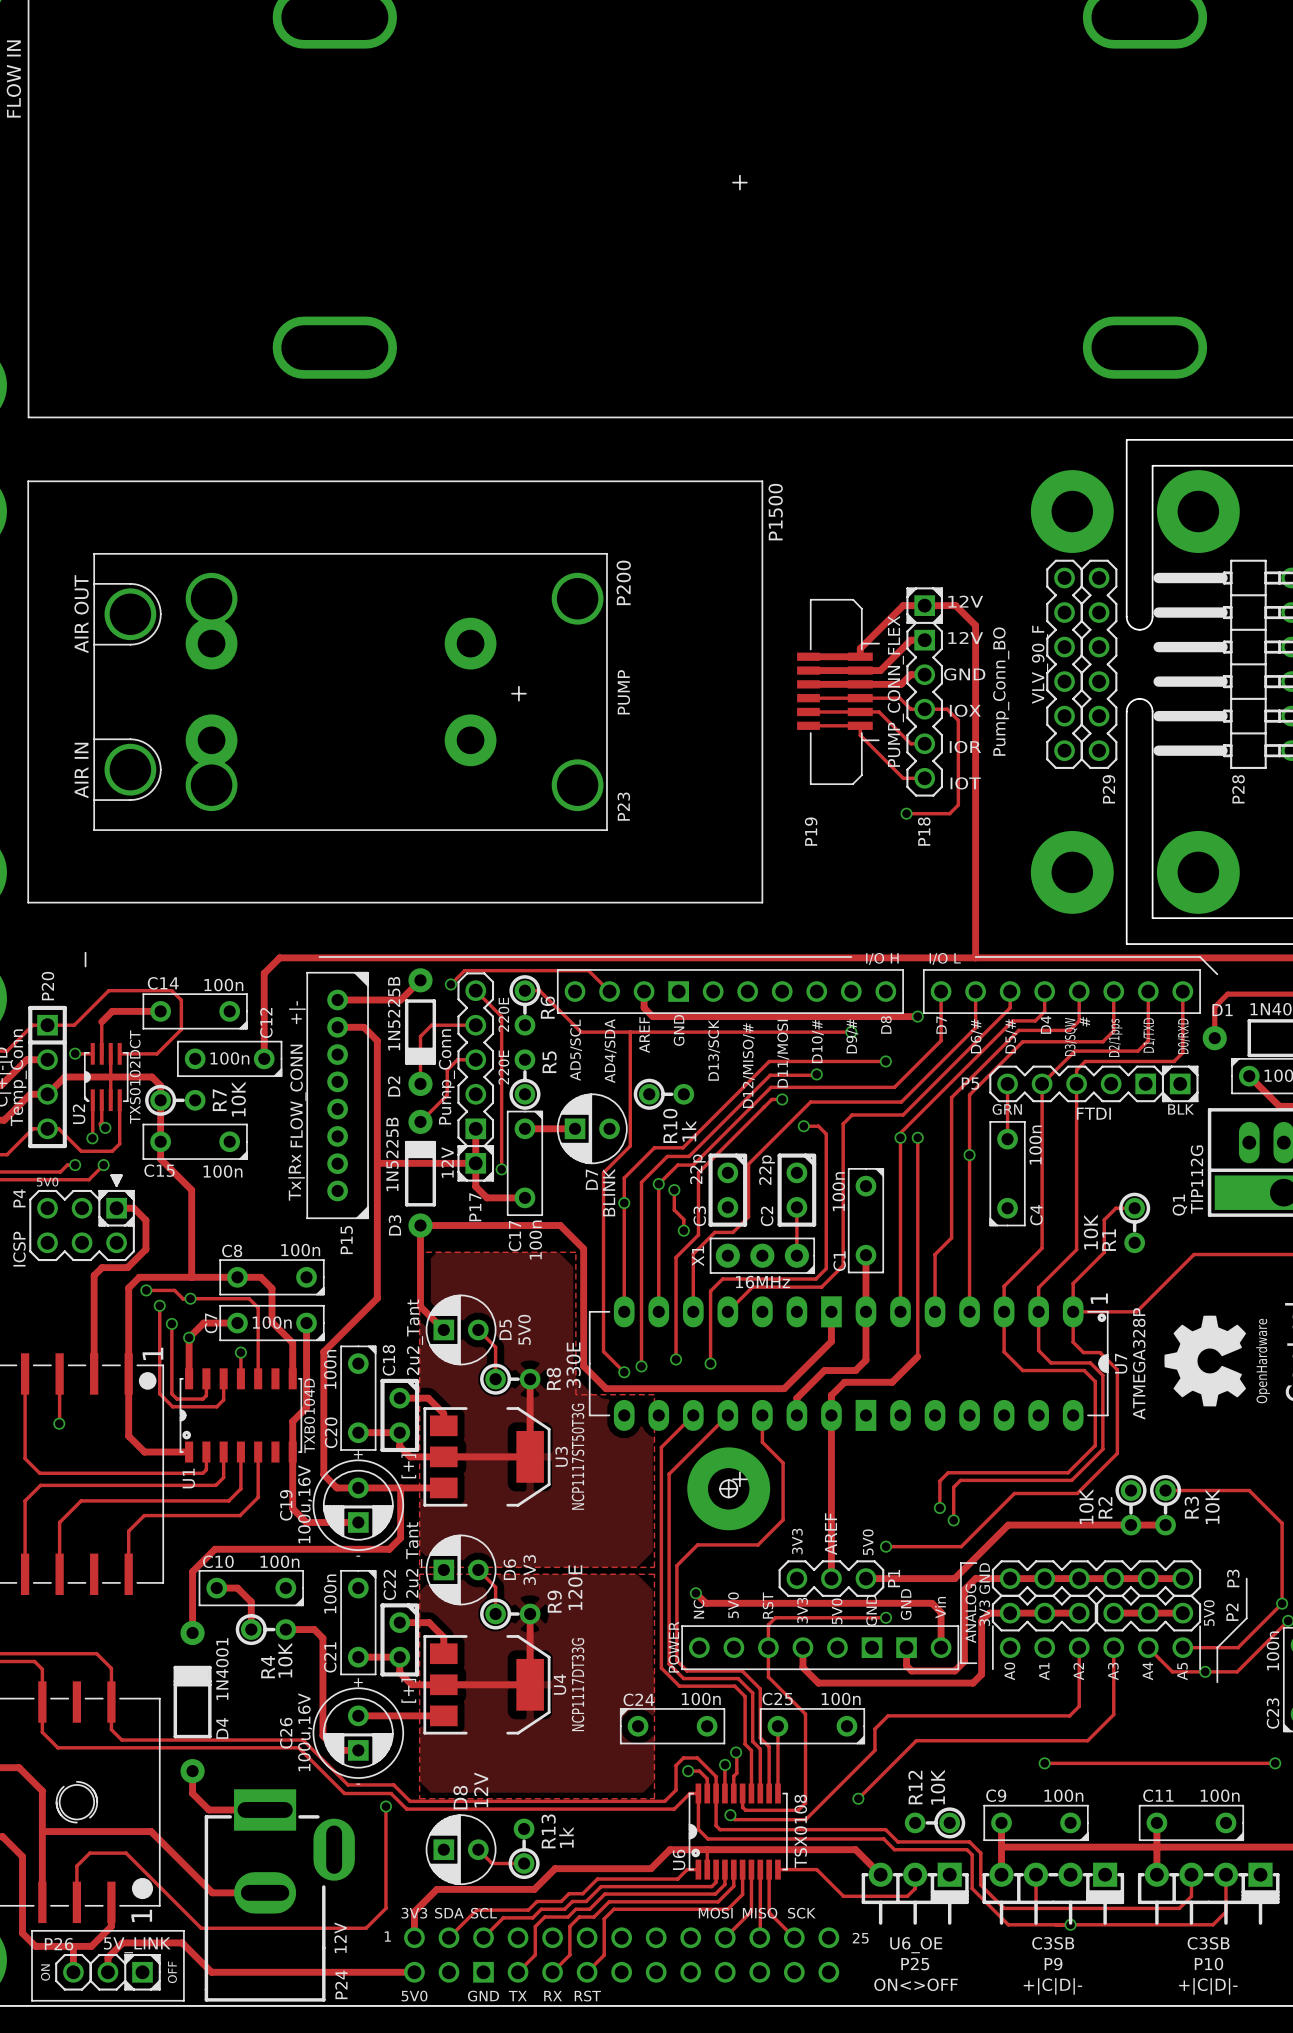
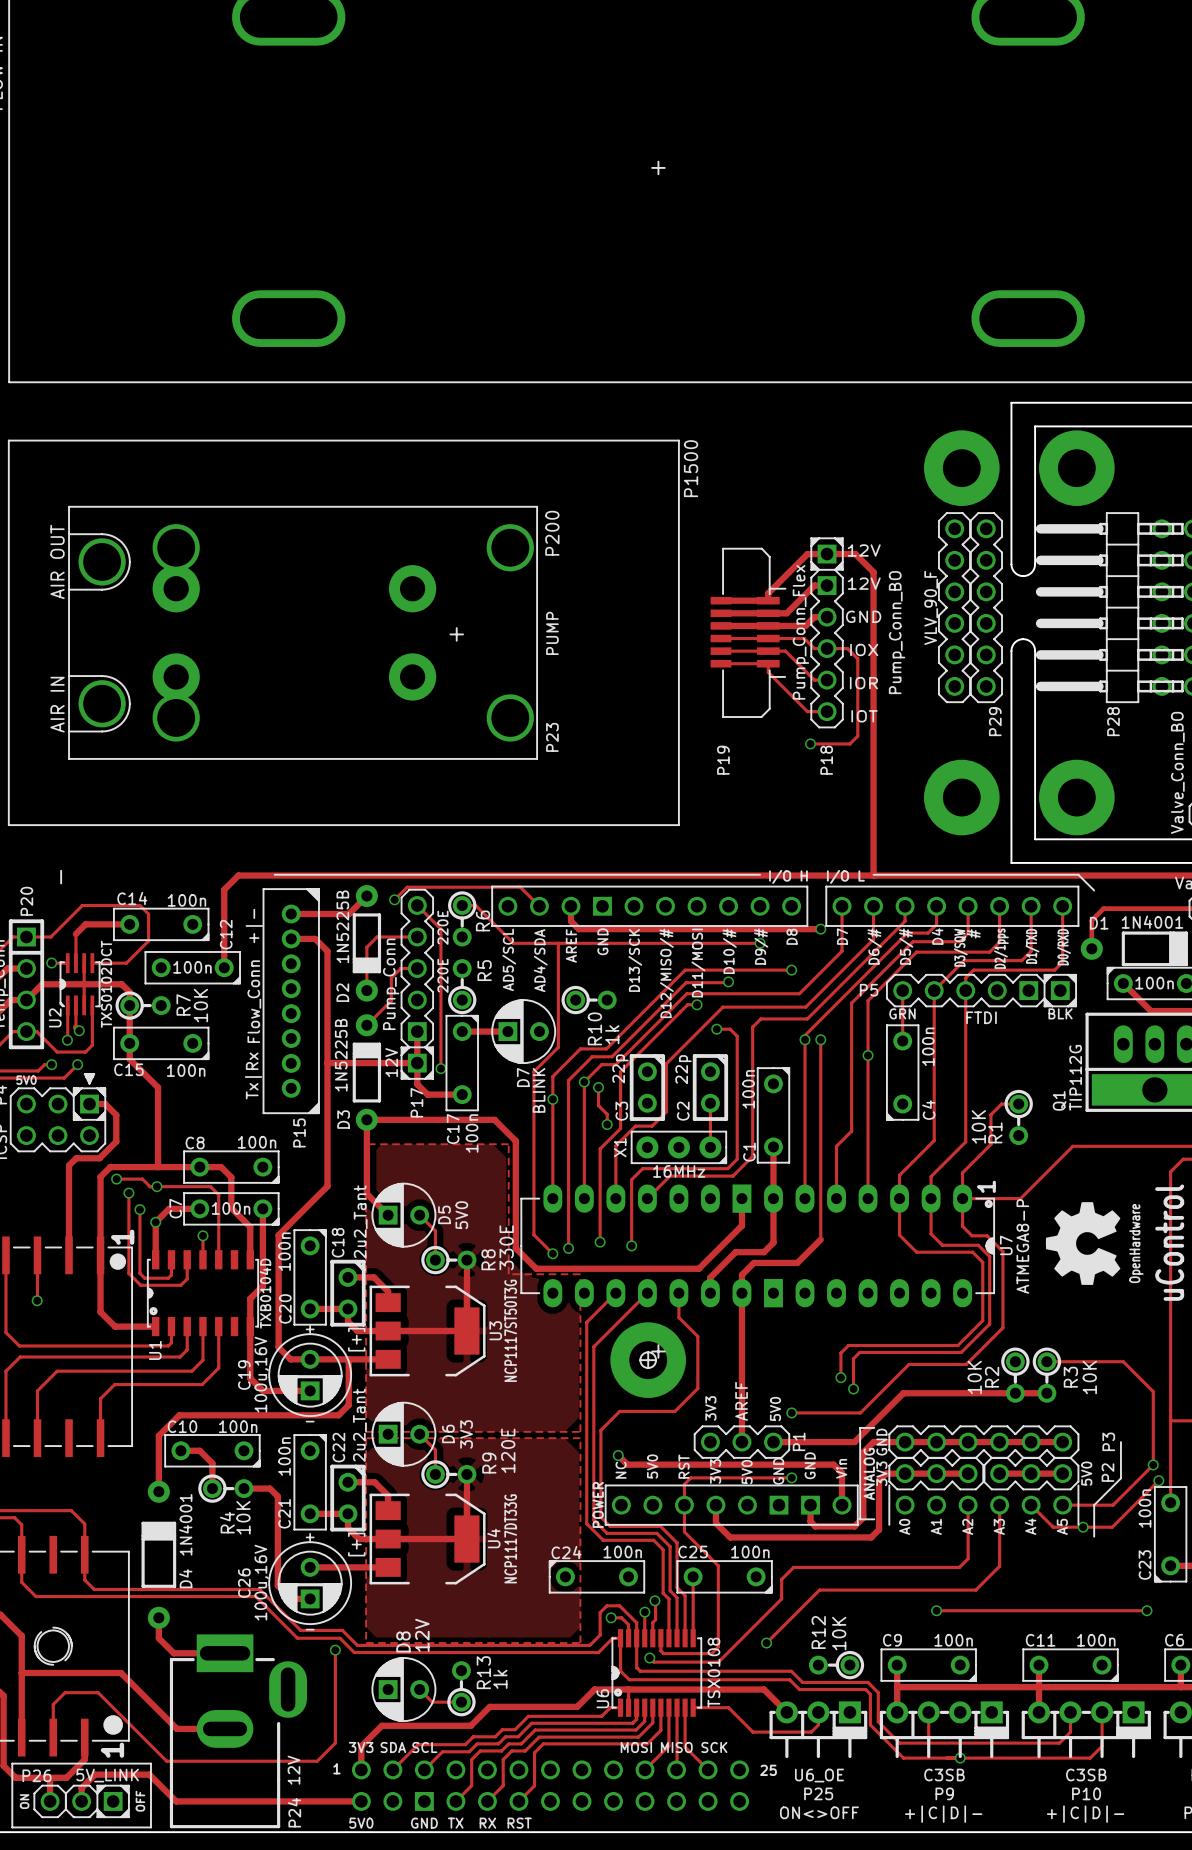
P19 value: PUMP_CONN_FLEX (895, 691) -> Pump_Conn_Flex (800, 632)
P15 value: FLOW_CONN (298, 1096) -> Flow_Conn (254, 1001)
U7 value: ATMEGA328P (1139, 1363) -> ATMEGA8-P (1022, 1246)

